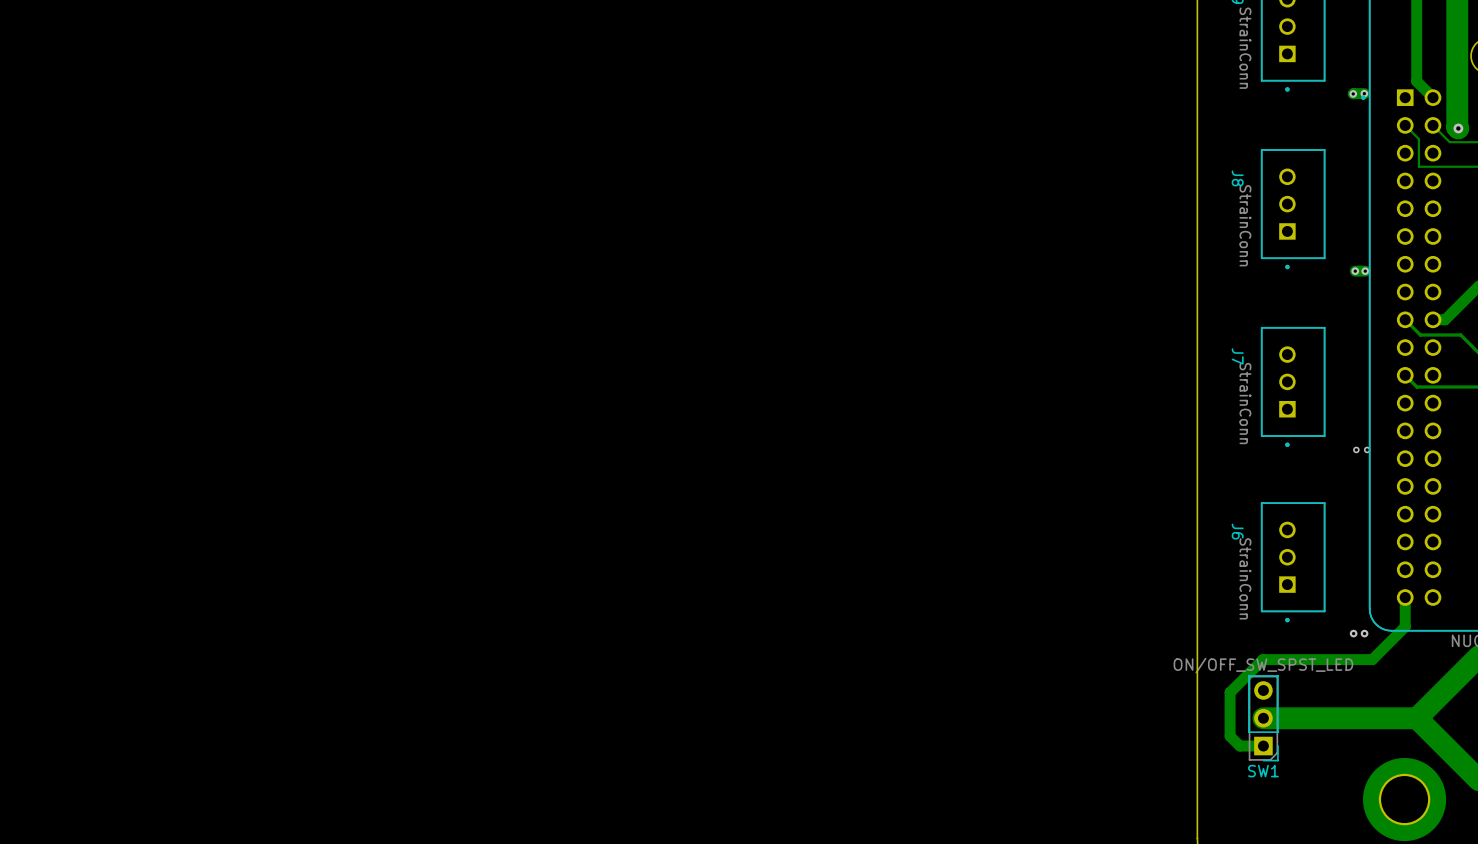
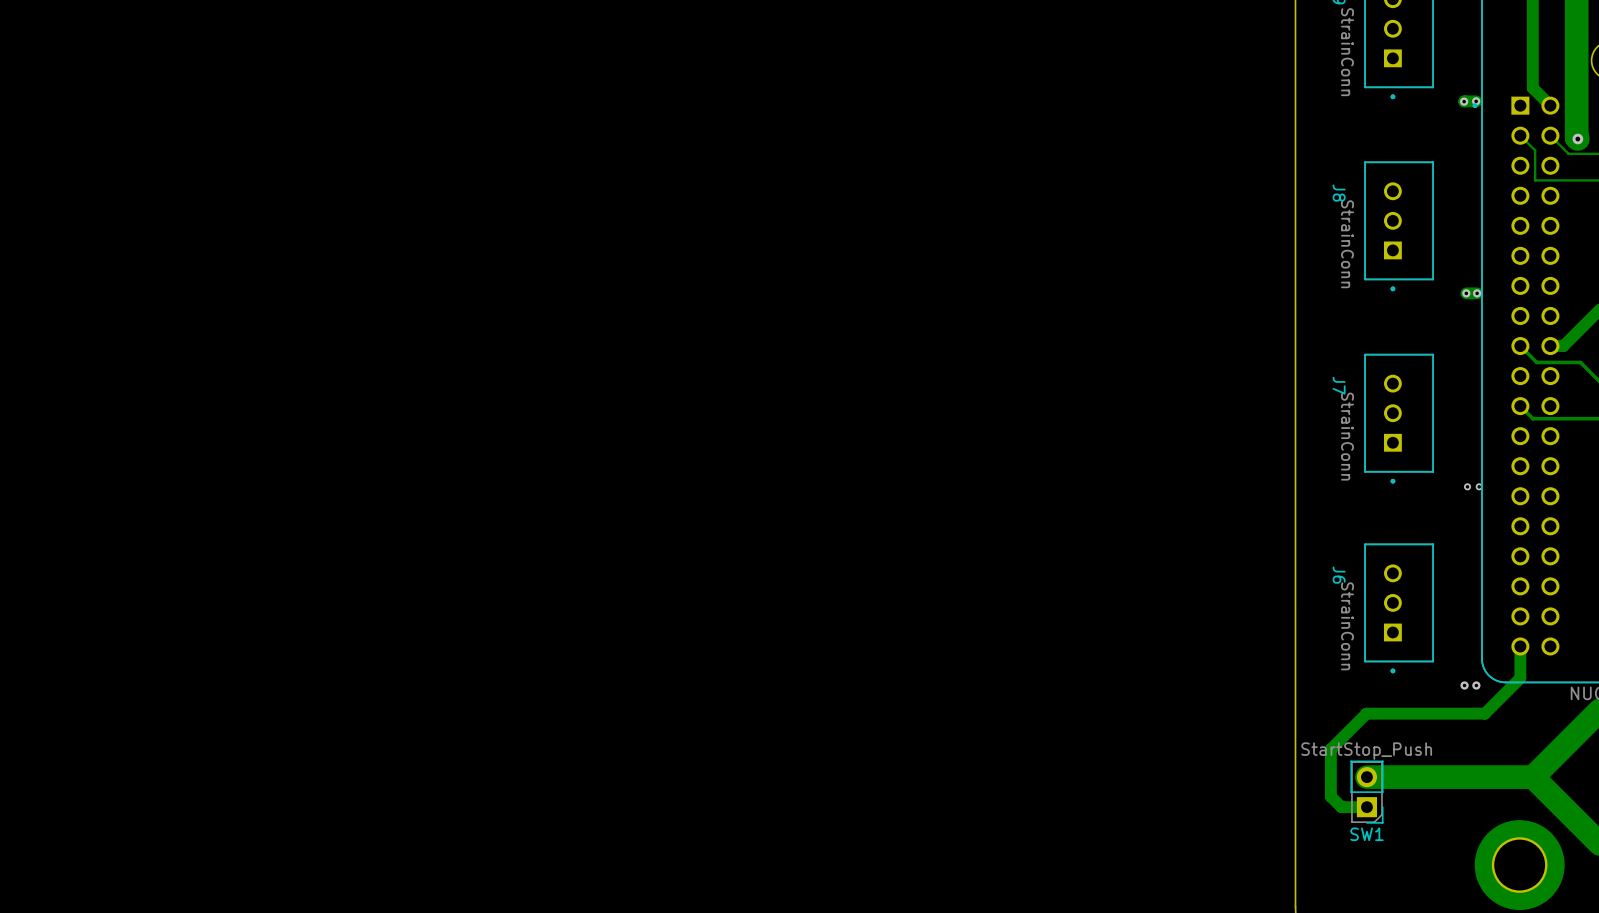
SW1 value: ON/OFF_SW_SPST_LED (1263, 665) -> StartStop_Push (1366, 751)
SW1 footprint: [1248, 675, 1279, 762] -> [1350, 760, 1384, 824]

